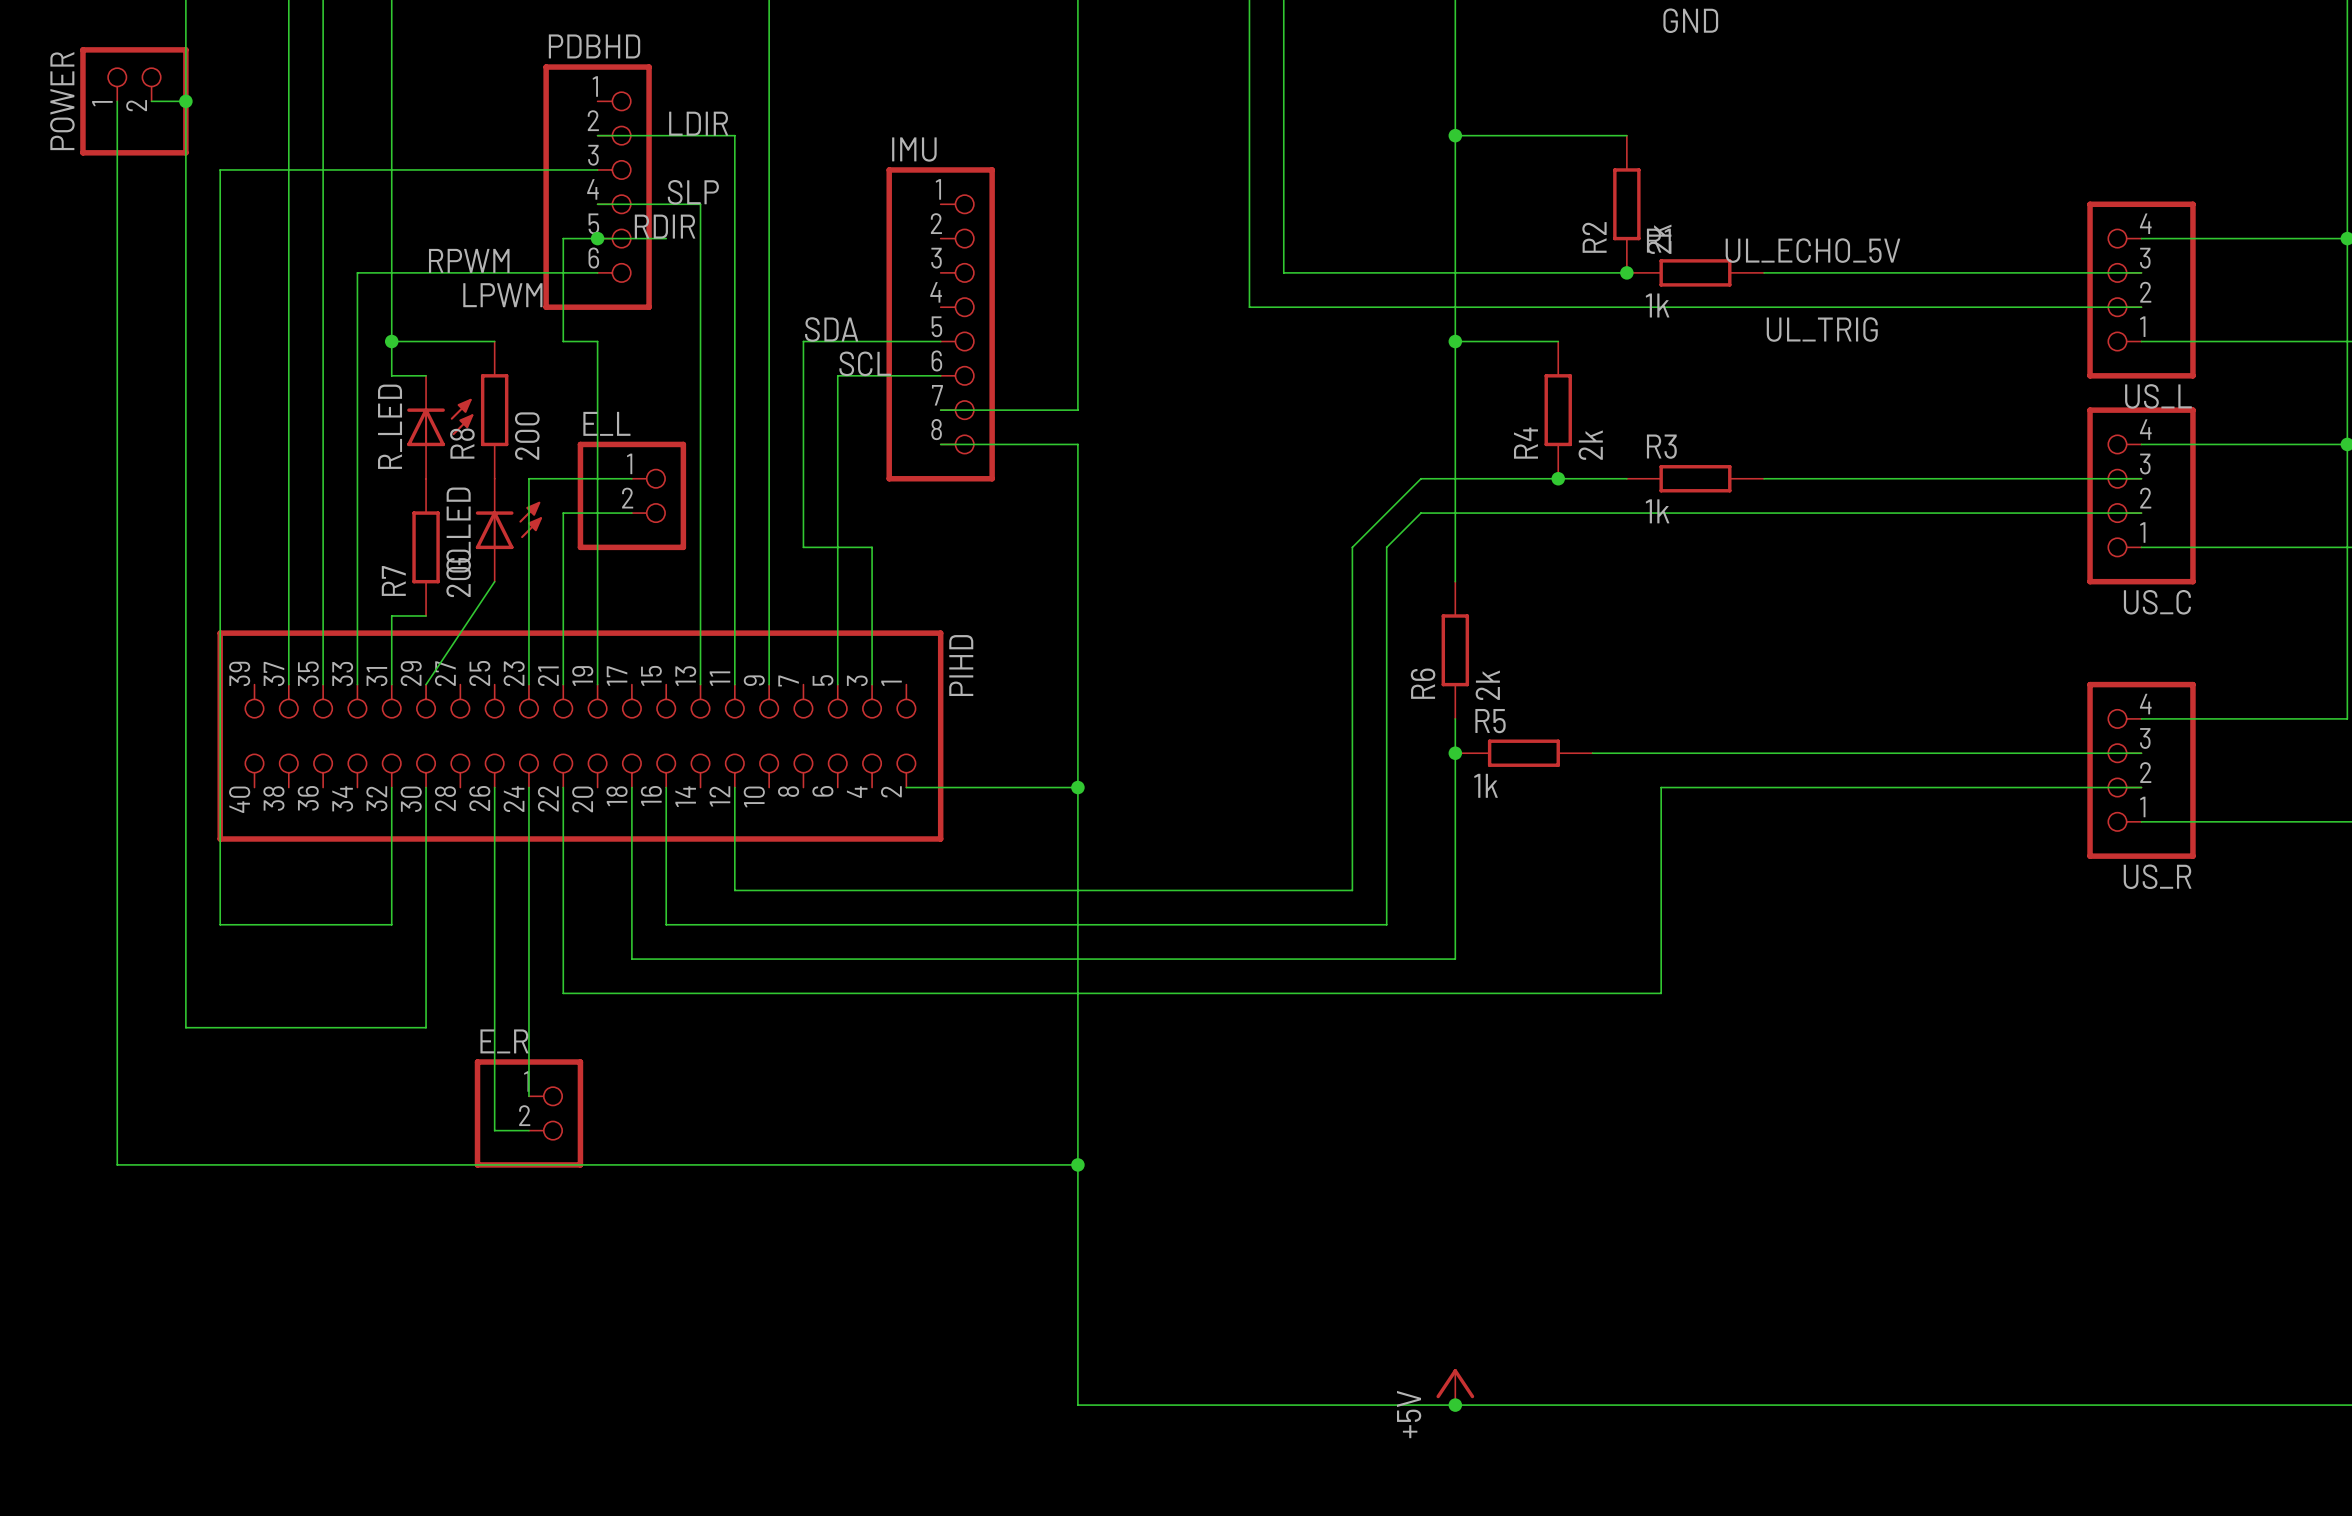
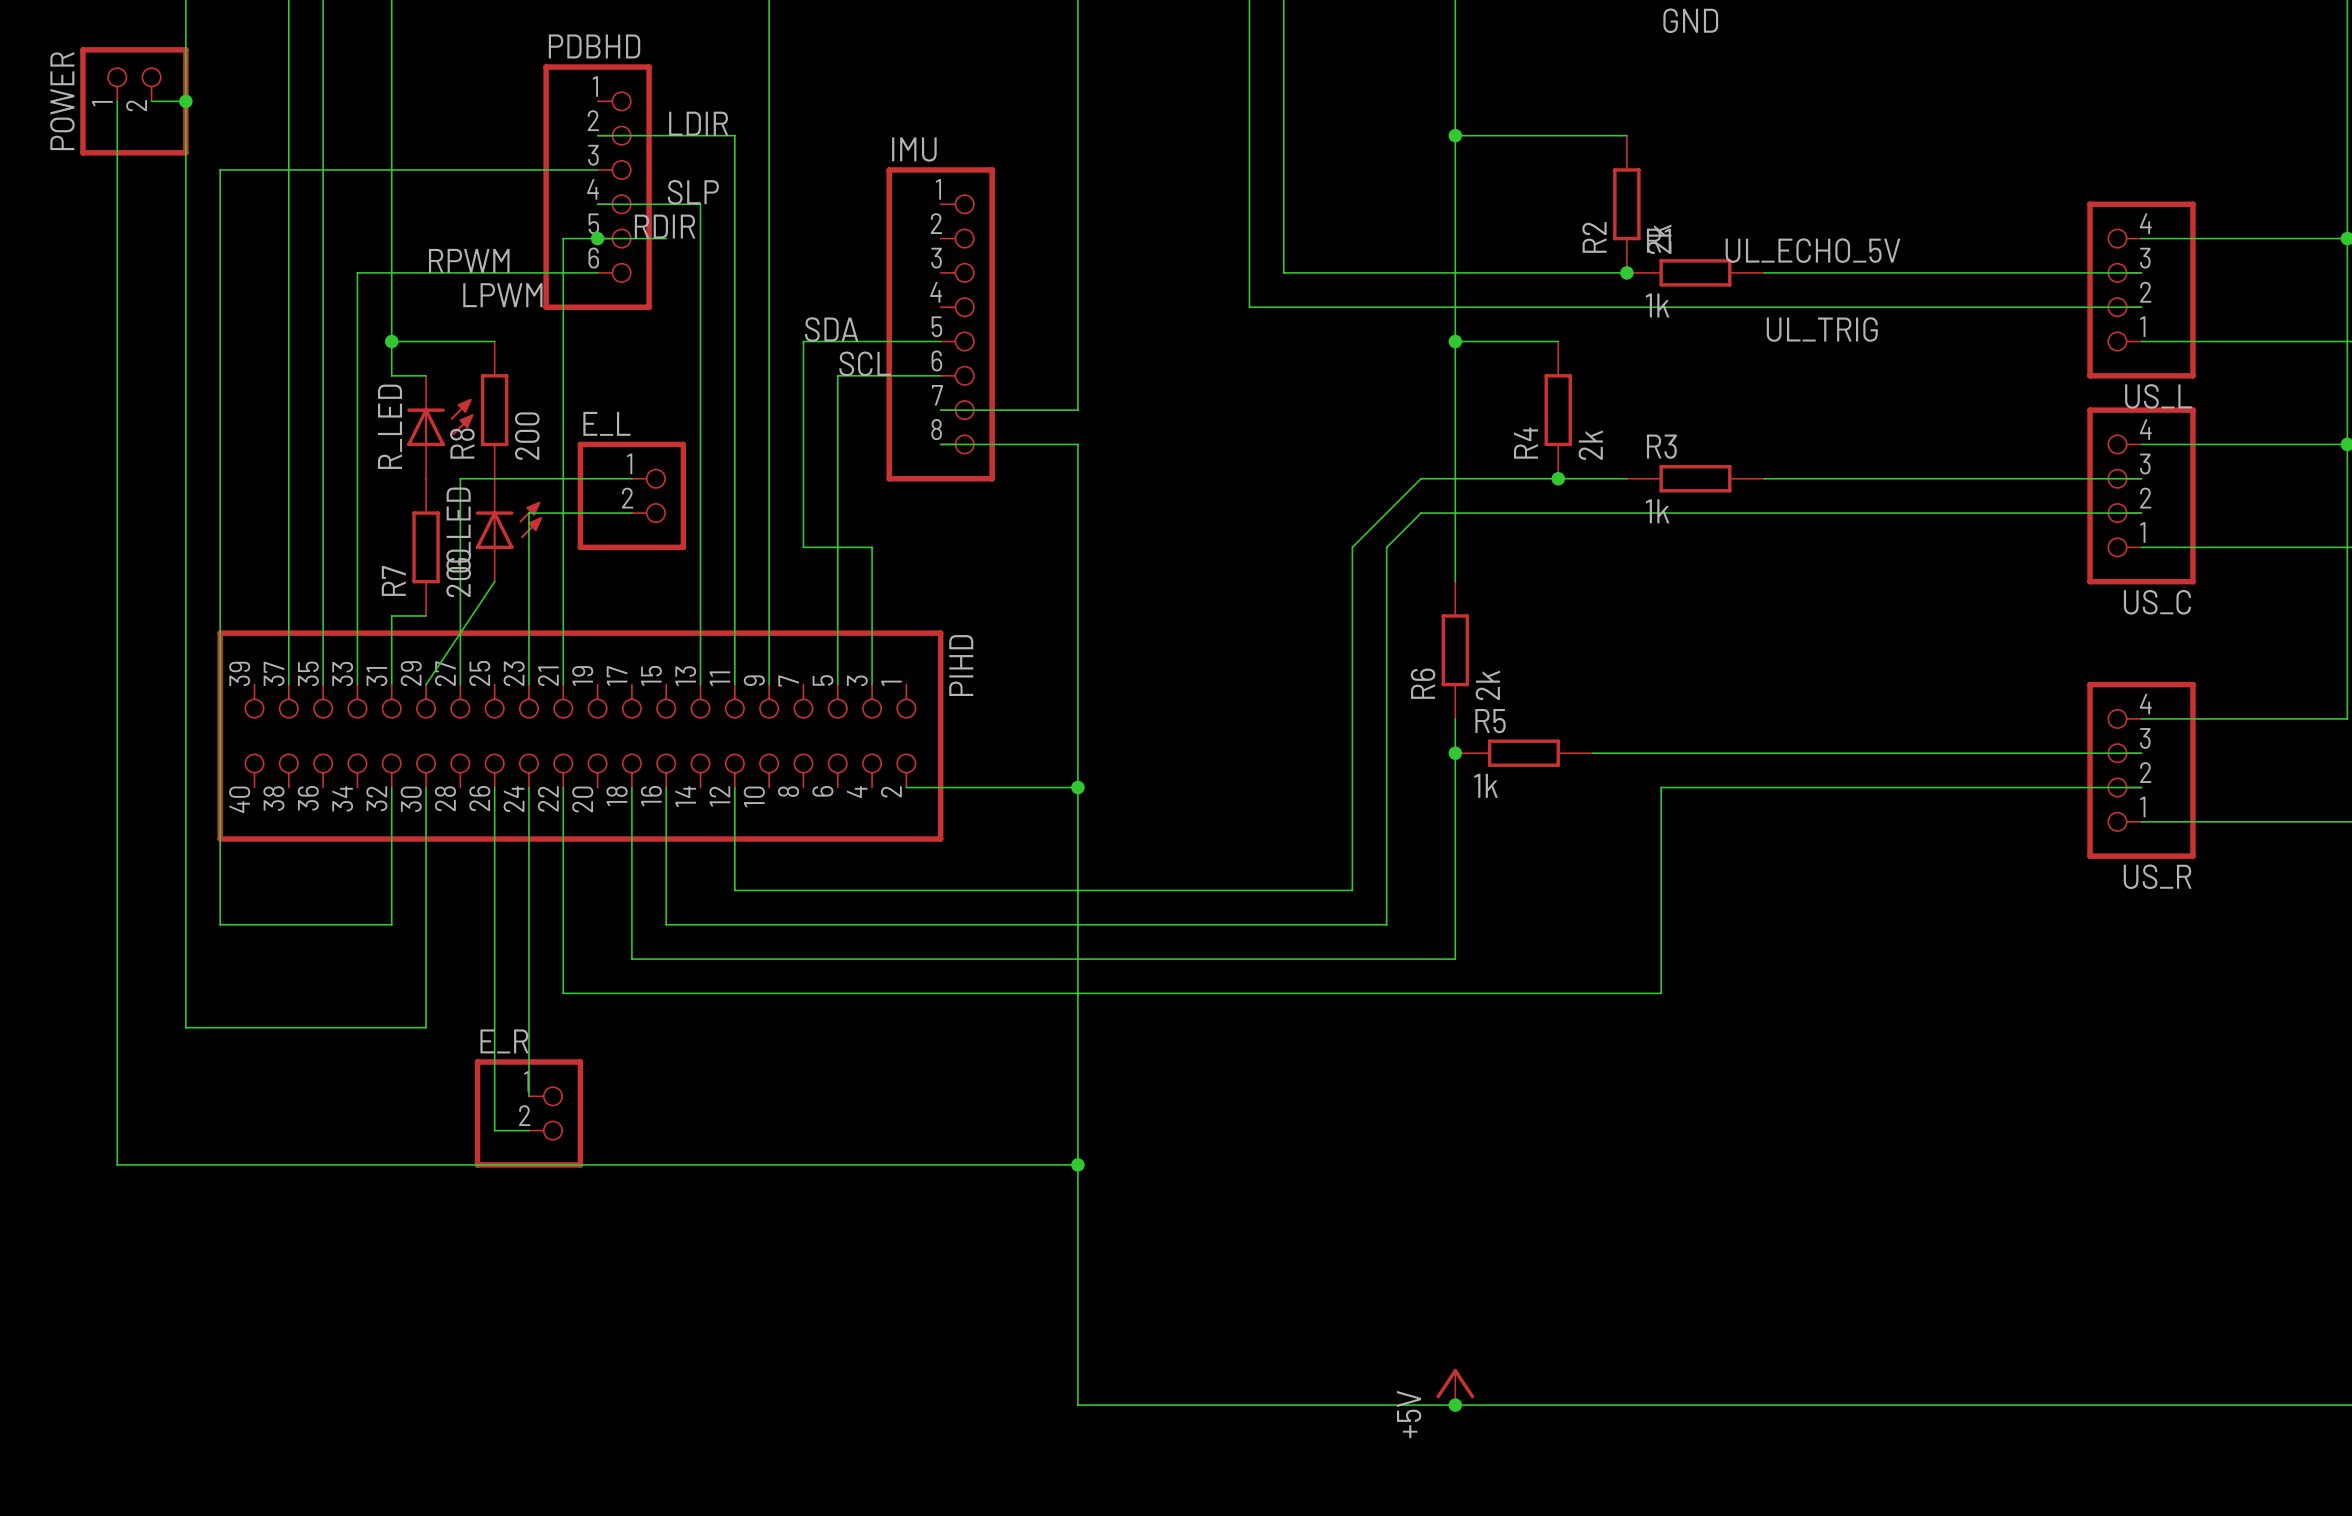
wire: (563, 341) (597, 341) (597, 684) -> none
wire: (528, 478) (528, 513) -> (563, 341) (563, 513) (528, 513)
wire: none -> (528, 478) (460, 478) (460, 684)

